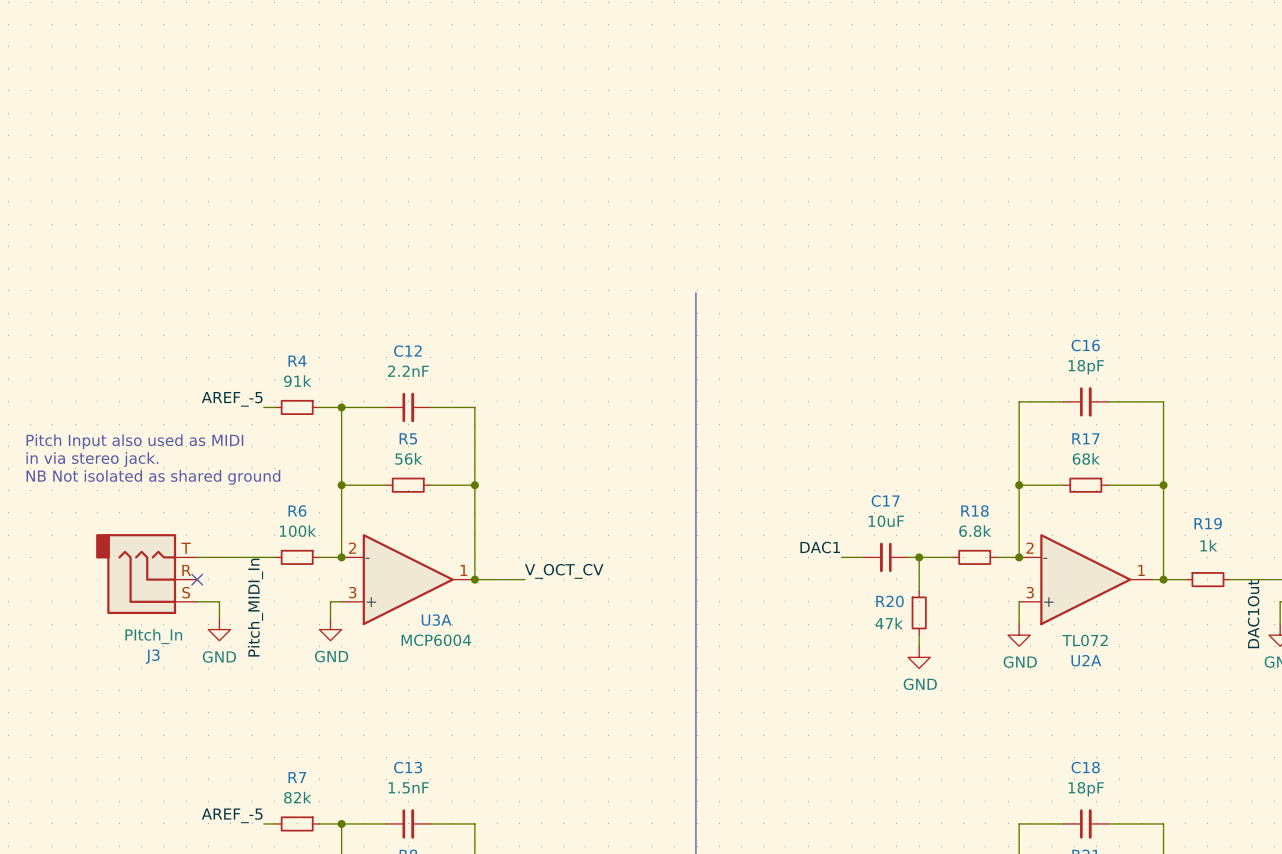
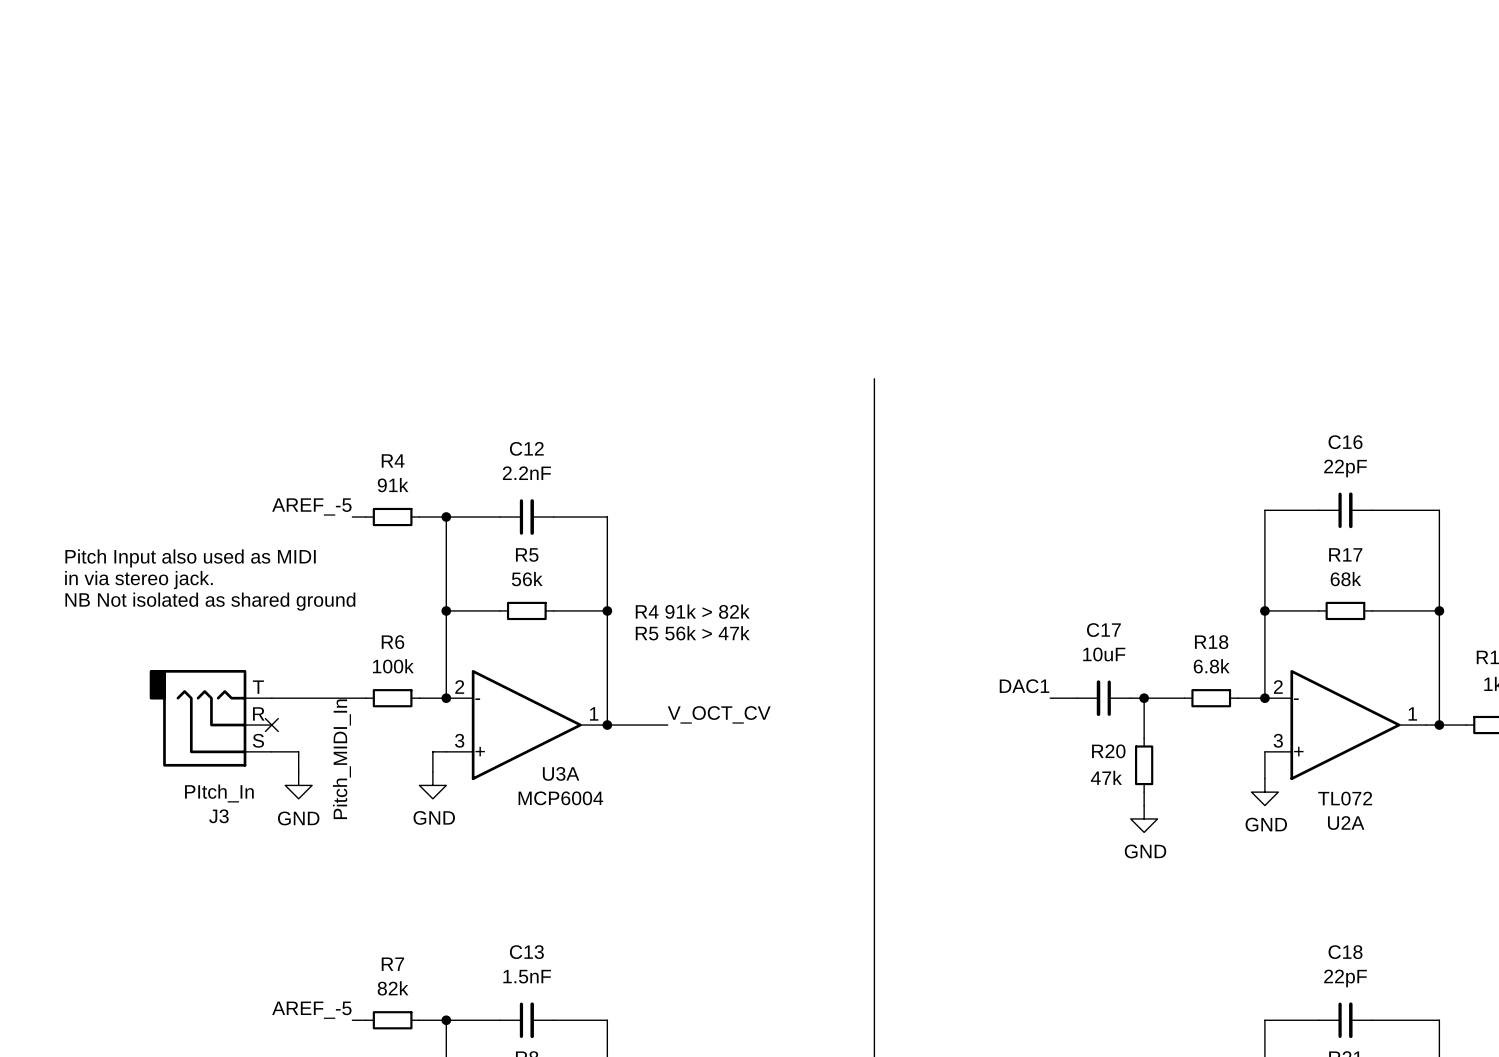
C16 value: 18pF (1086, 367) -> 22pF (1345, 468)
text: none -> R4 91k > 82k (692, 611)
text: none -> R5 56k > 47k (692, 633)
C18 value: 18pF (1086, 789) -> 22pF (1345, 978)

